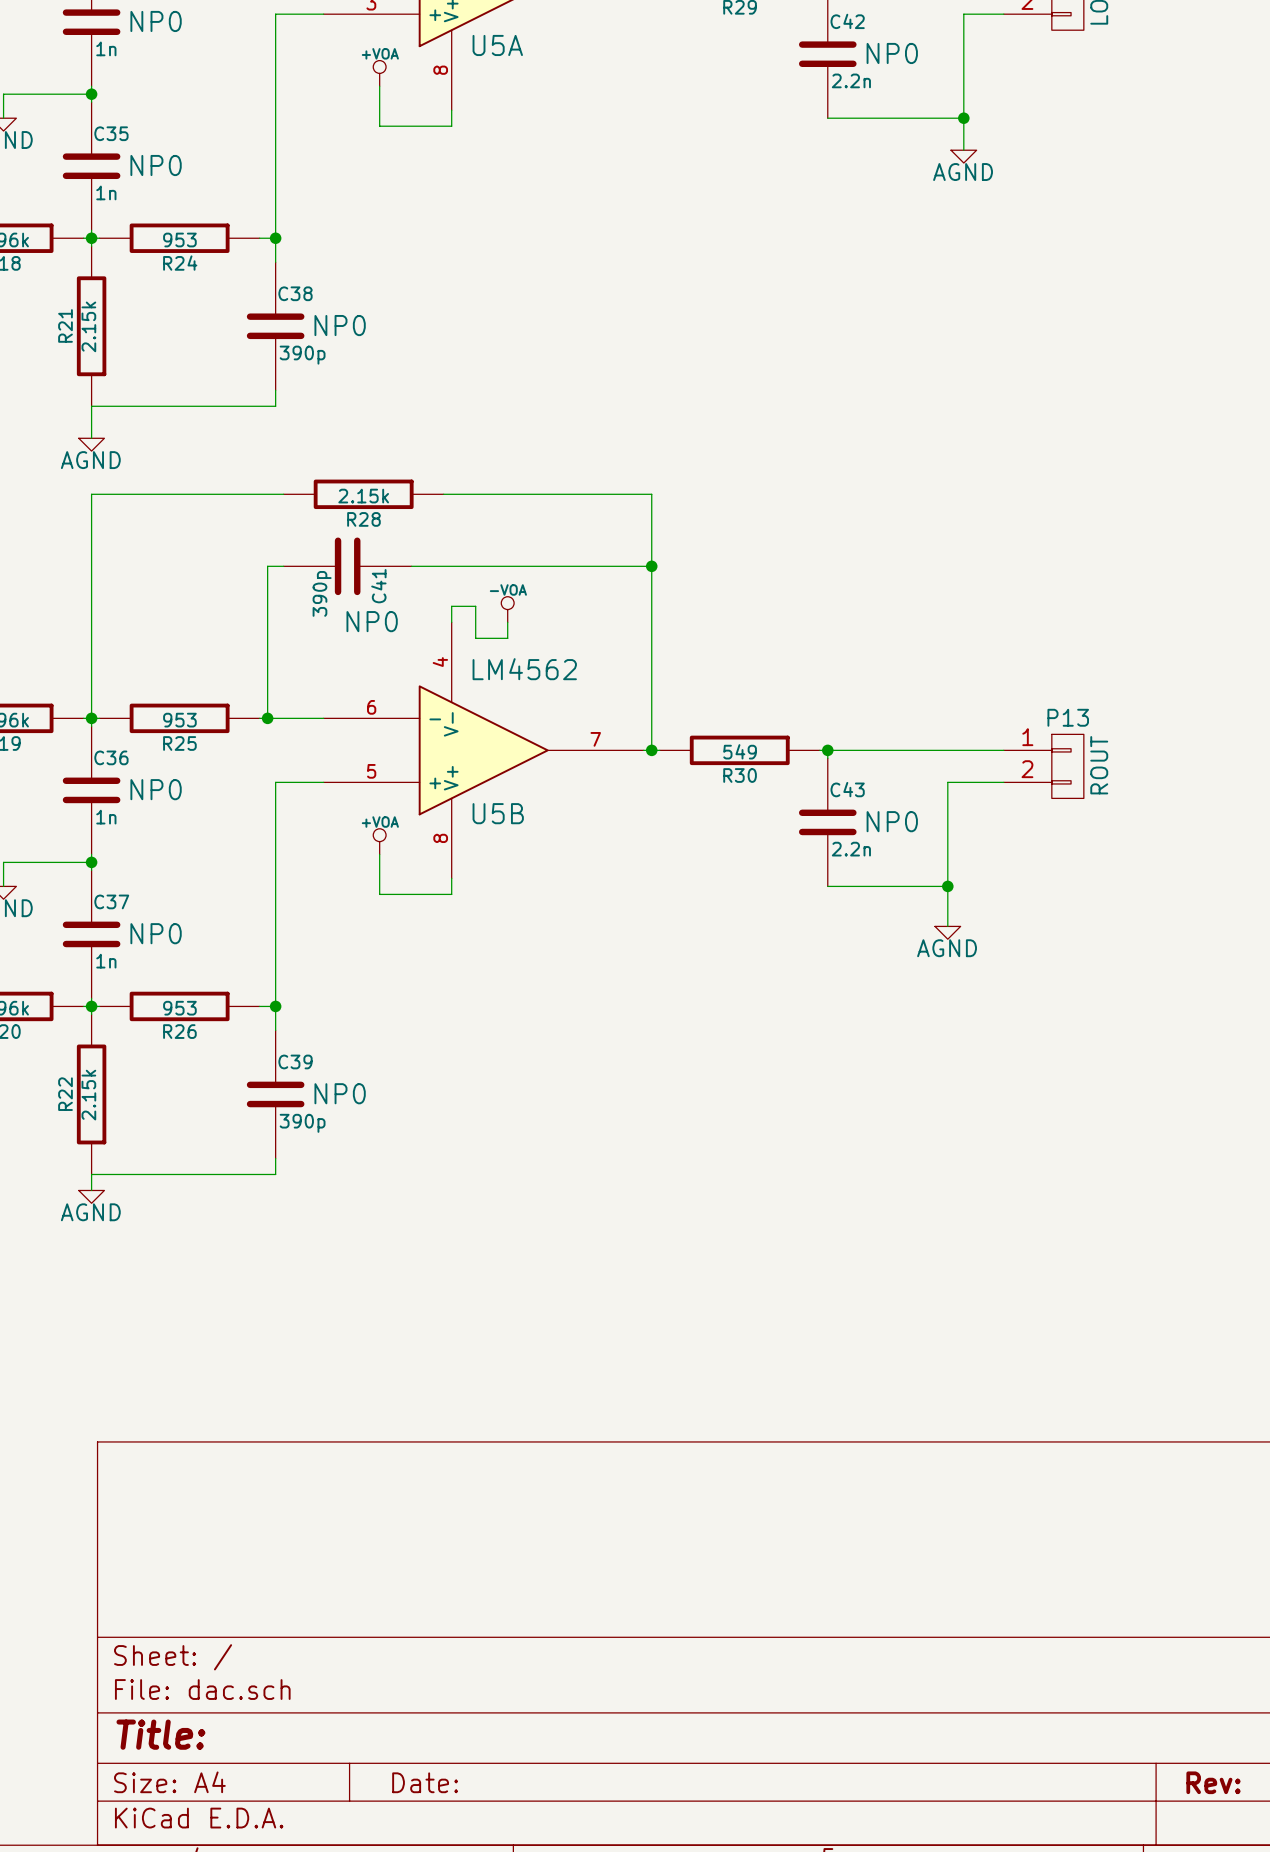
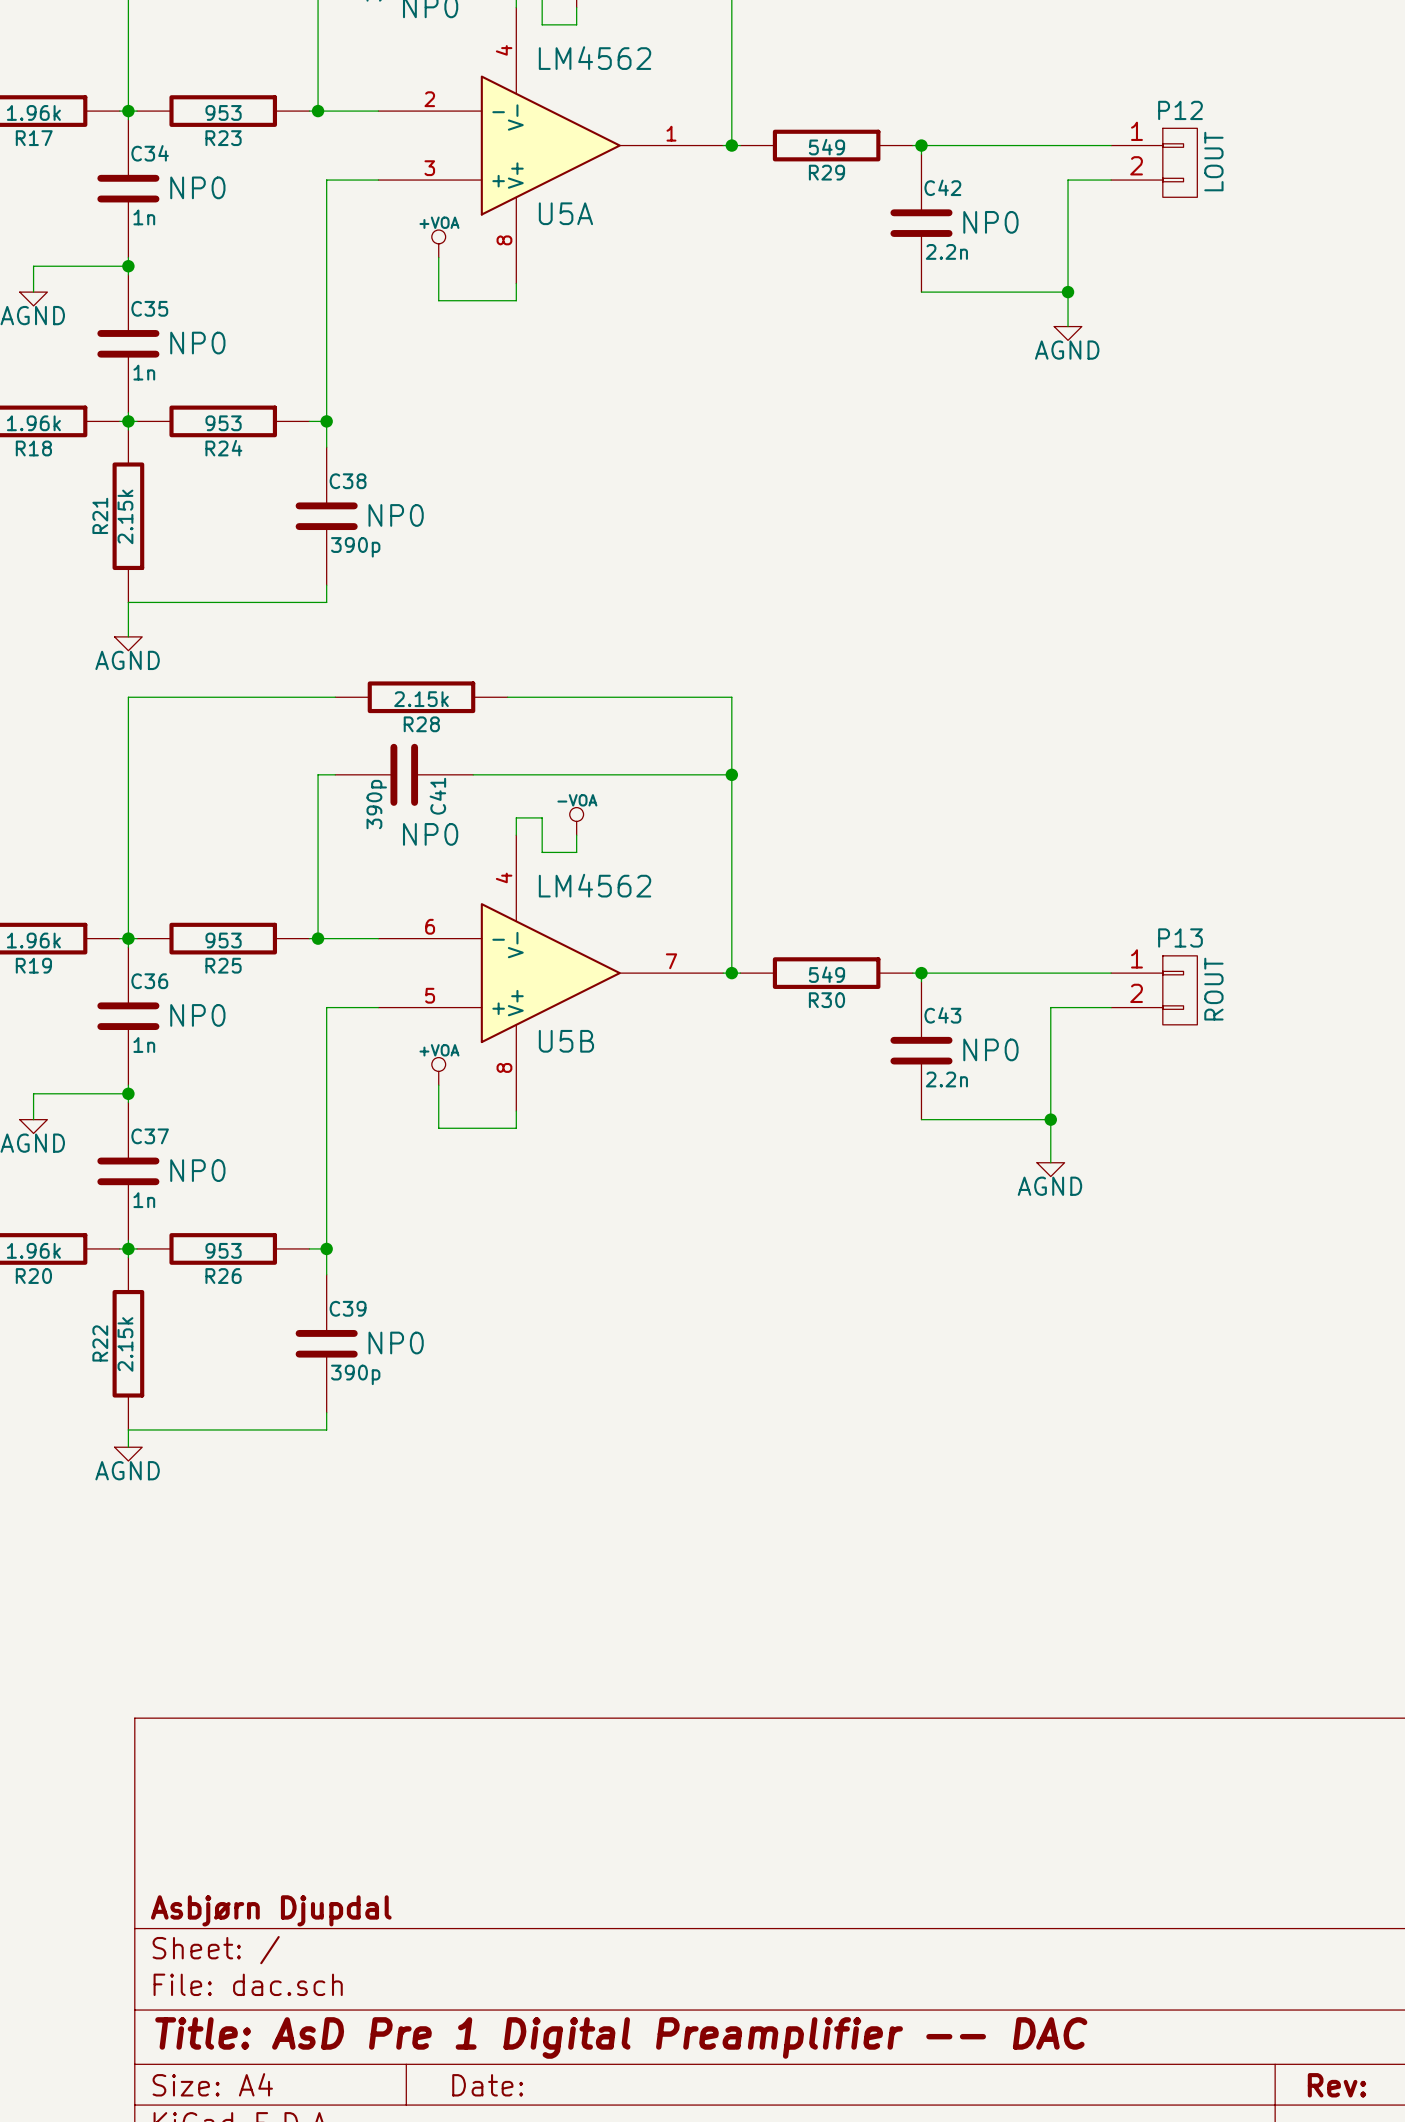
title block: none -> Asbjørn Djupdal (271, 1910)
title block: Title: (160, 1734) -> Title: AsD Pre 1 Digital Preamplifier -- DAC (621, 2037)

